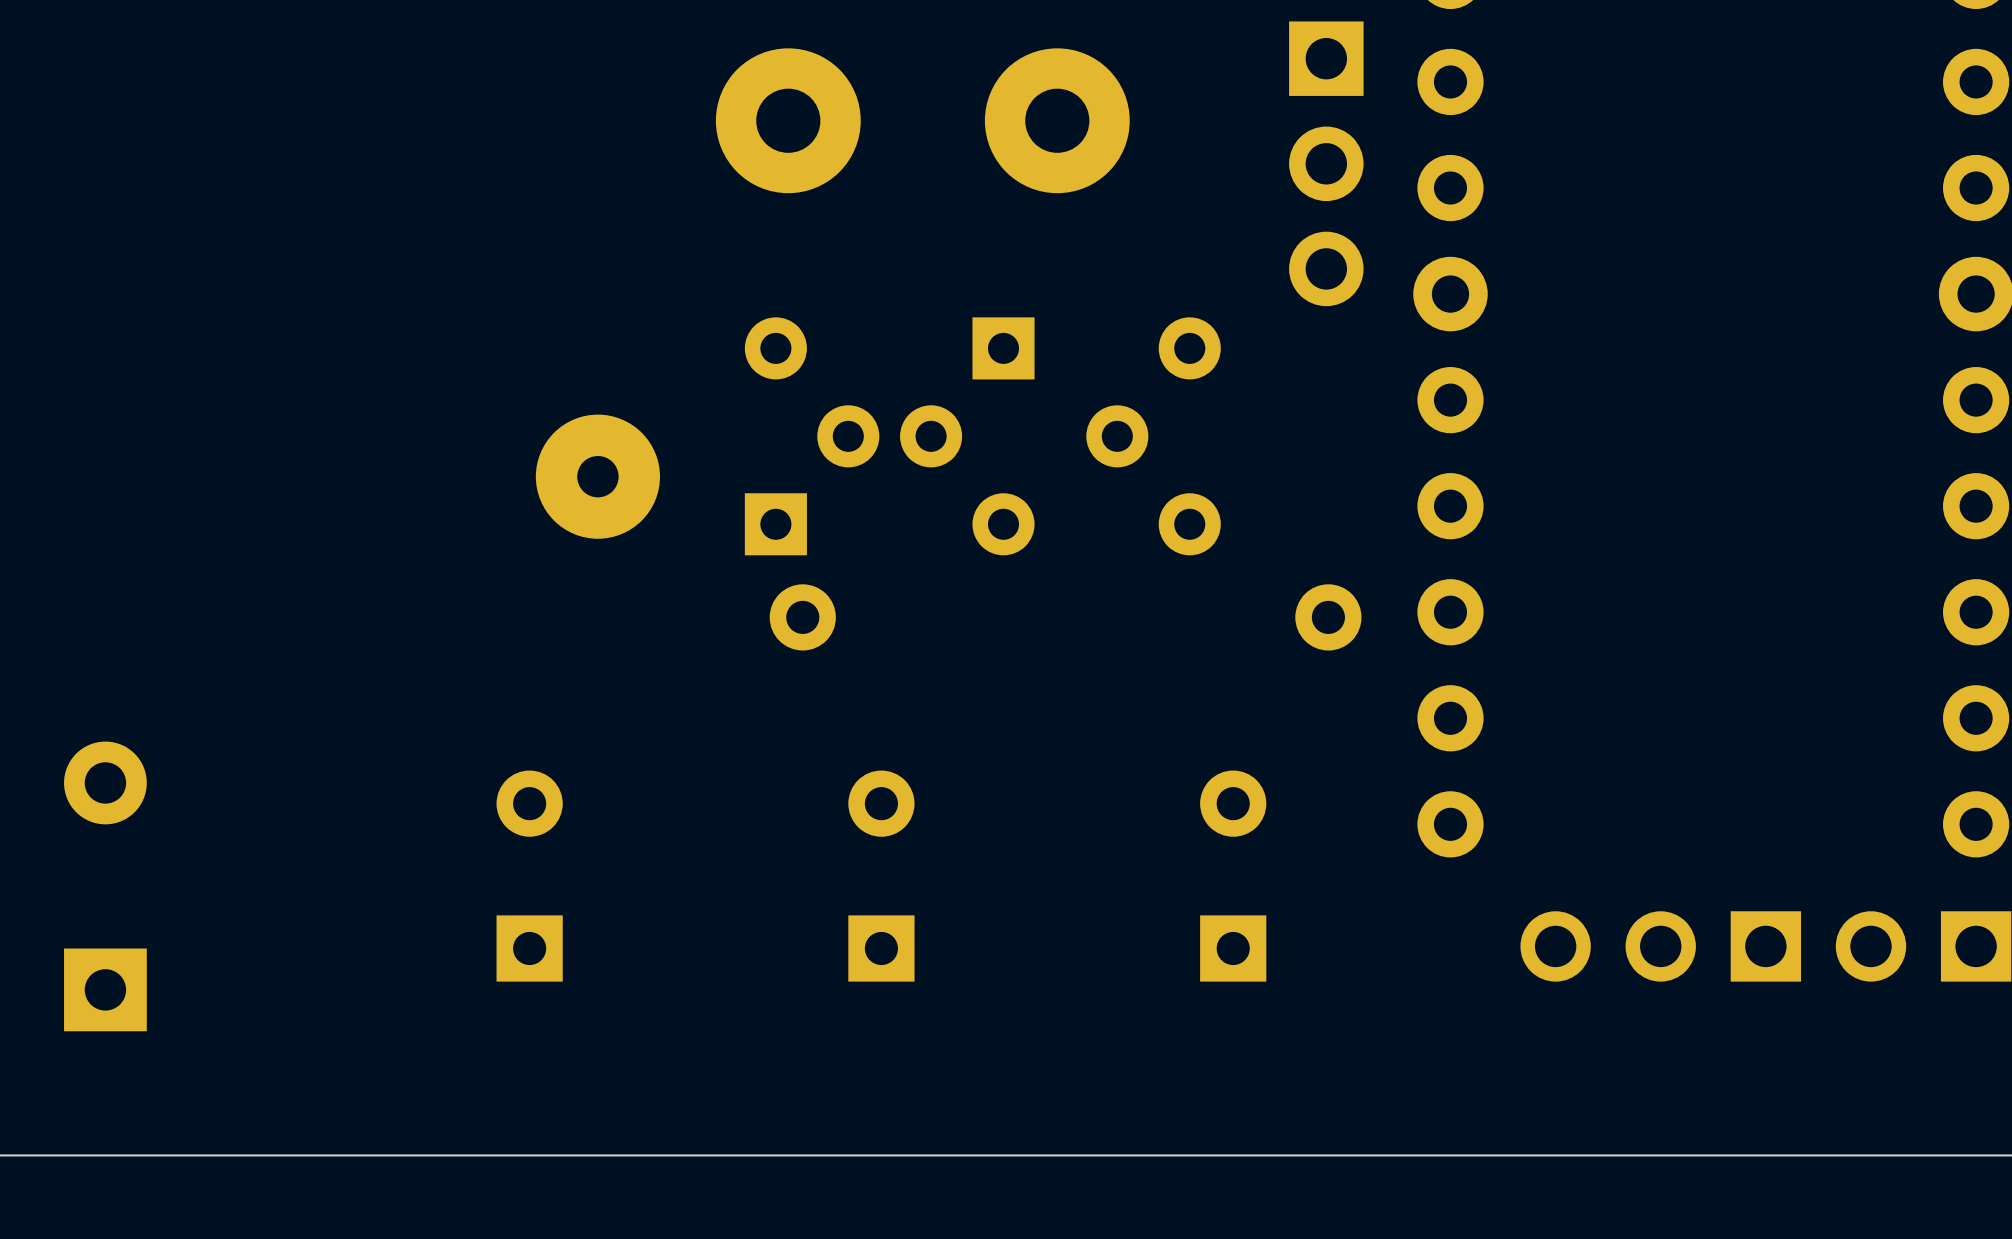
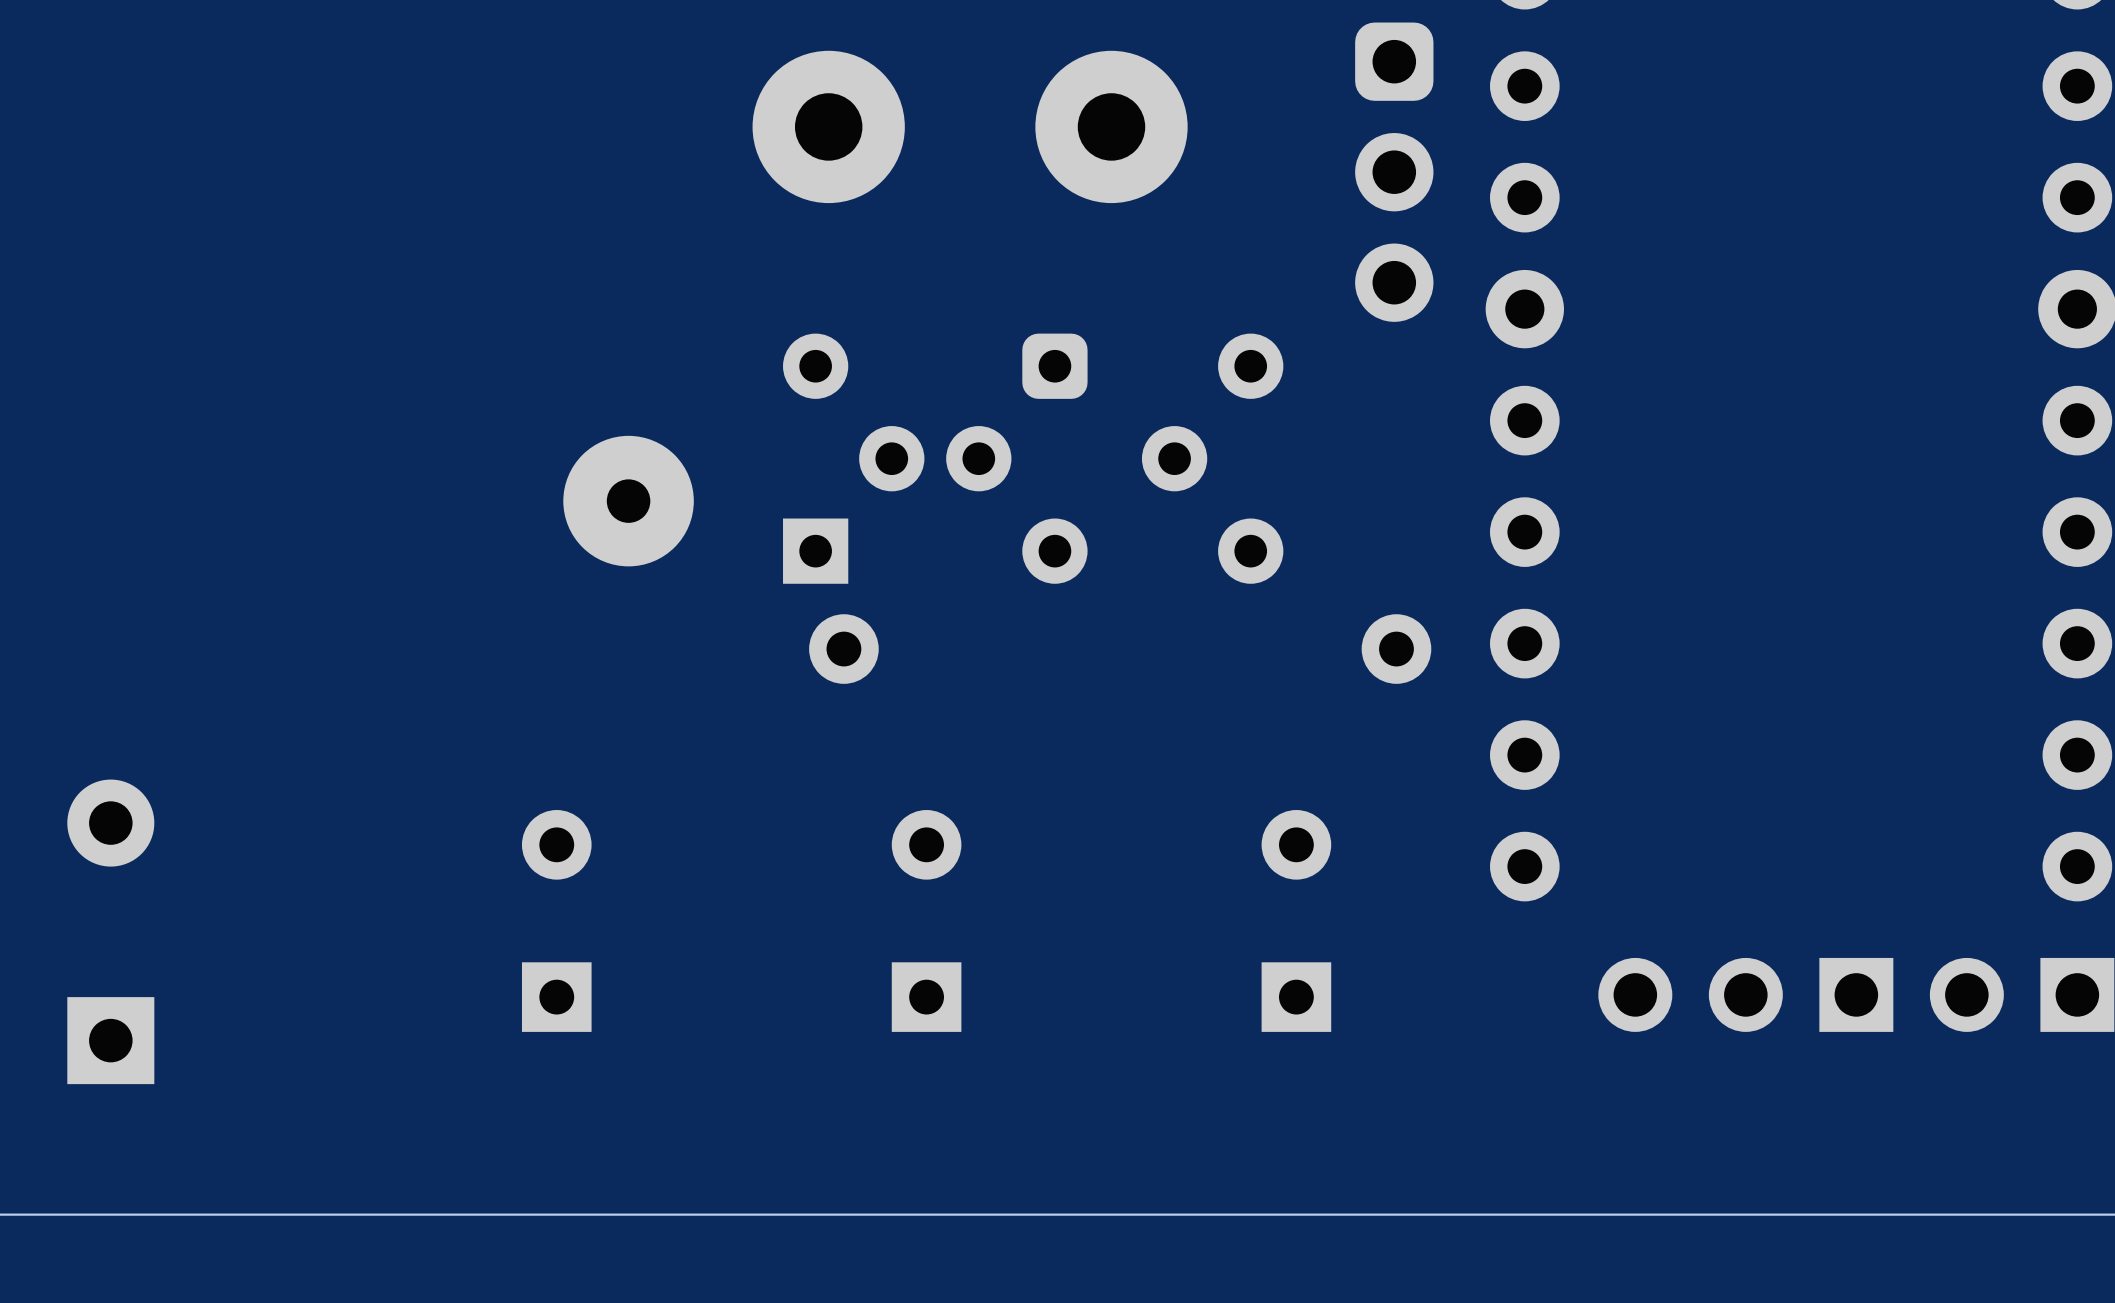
part footprint: [1289, 21, 1364, 307] -> [1355, 22, 1434, 322]
part footprint: [900, 317, 1035, 556] -> [946, 333, 1088, 584]

